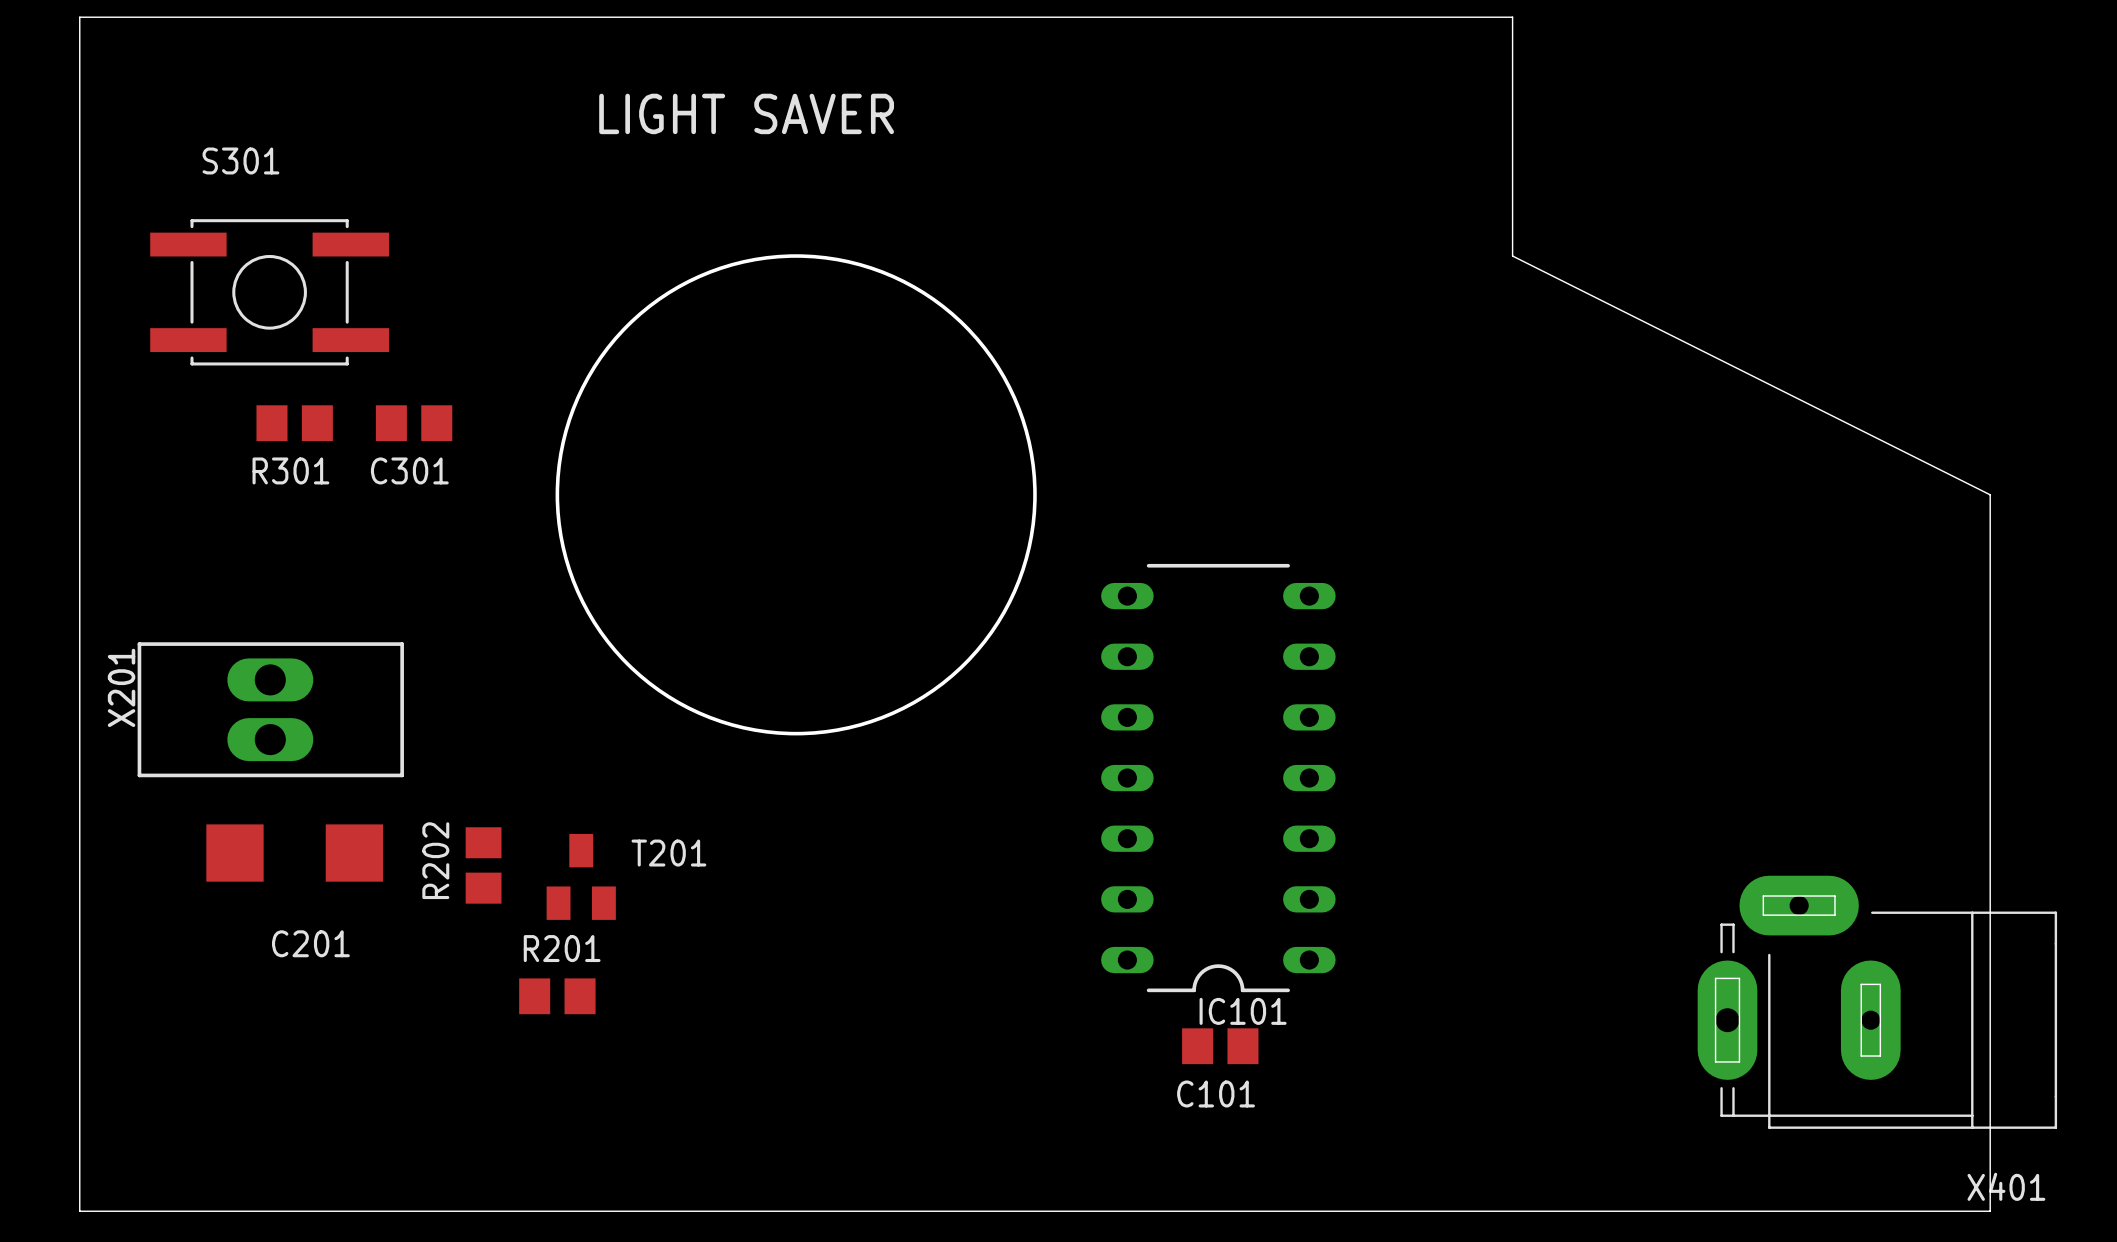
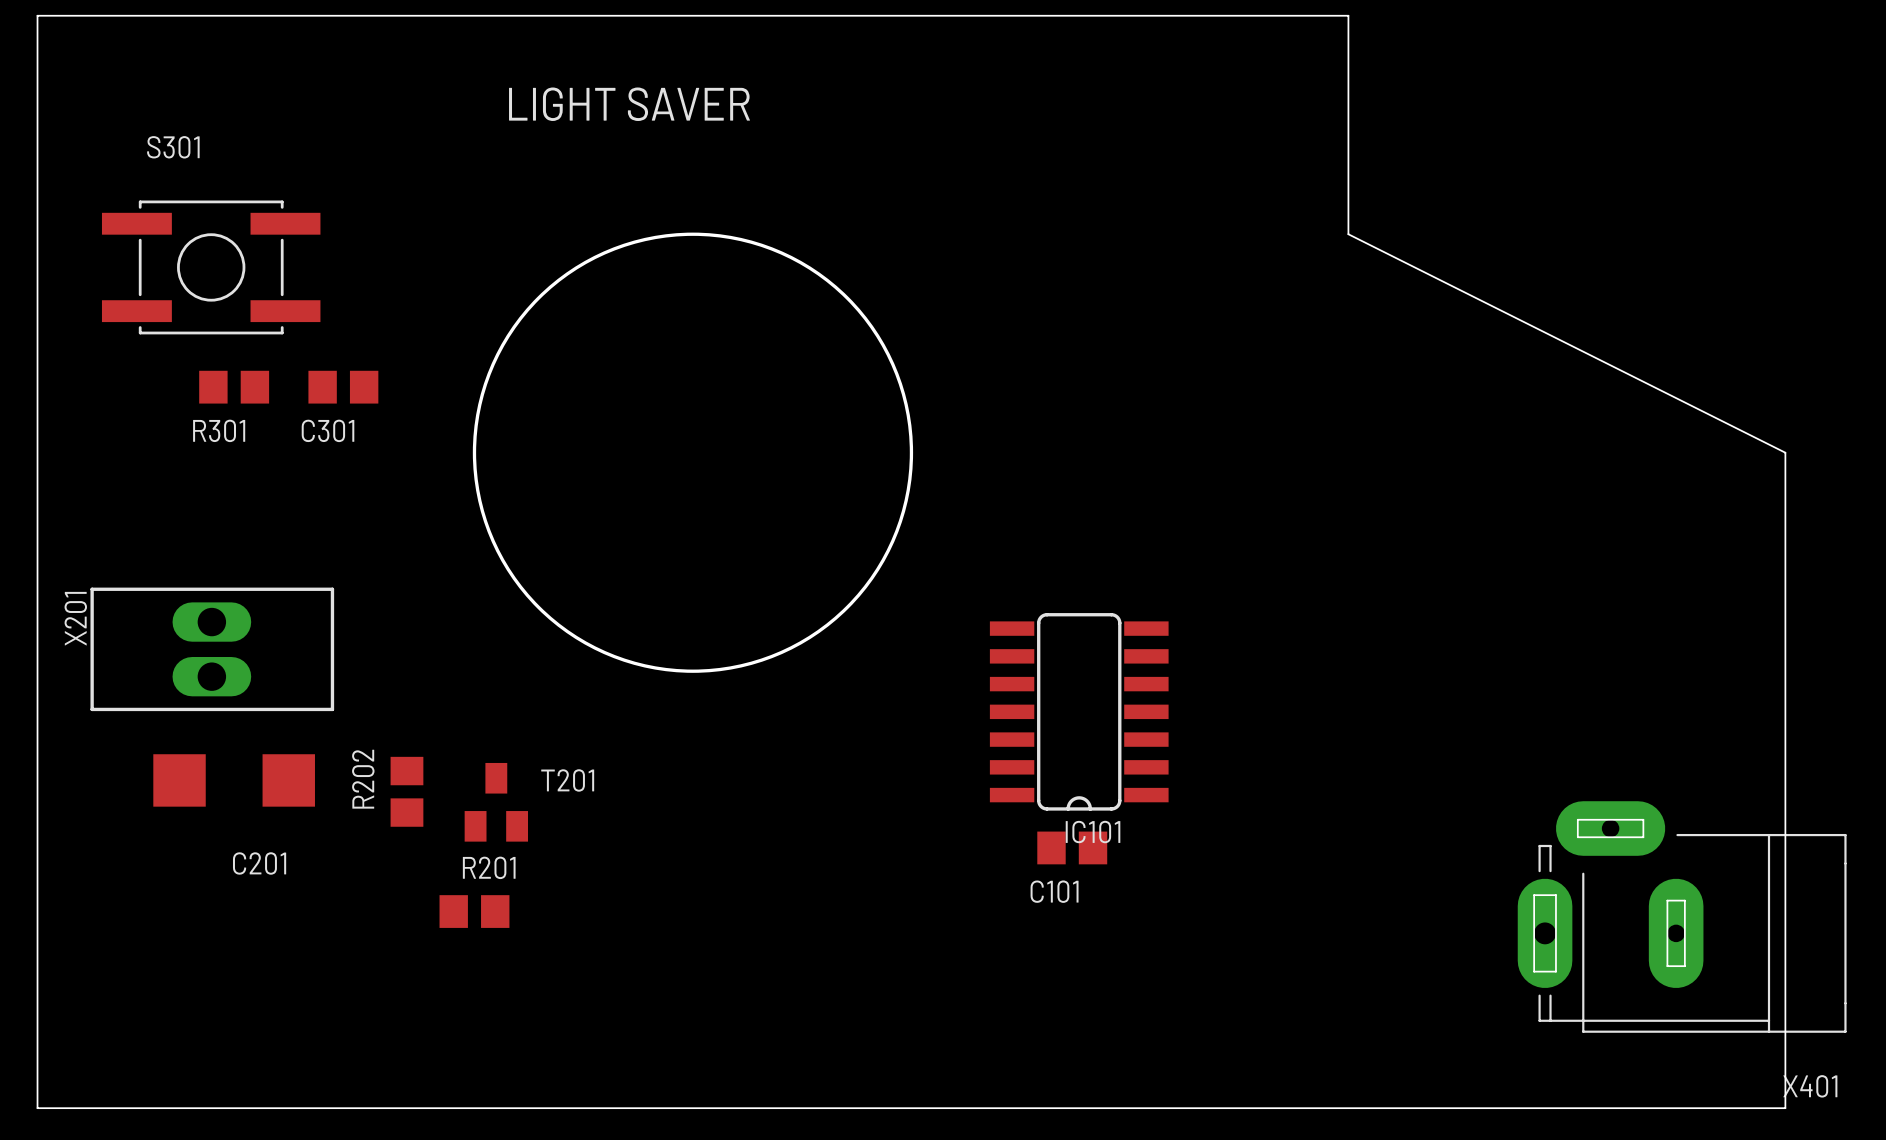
IC101 footprint: [1101, 563, 1336, 993] -> [989, 613, 1169, 811]
IC101 name position: IC101 (1243, 1011) -> IC101 (1093, 832)
C101 position: (1220, 1046) -> (1072, 847)

